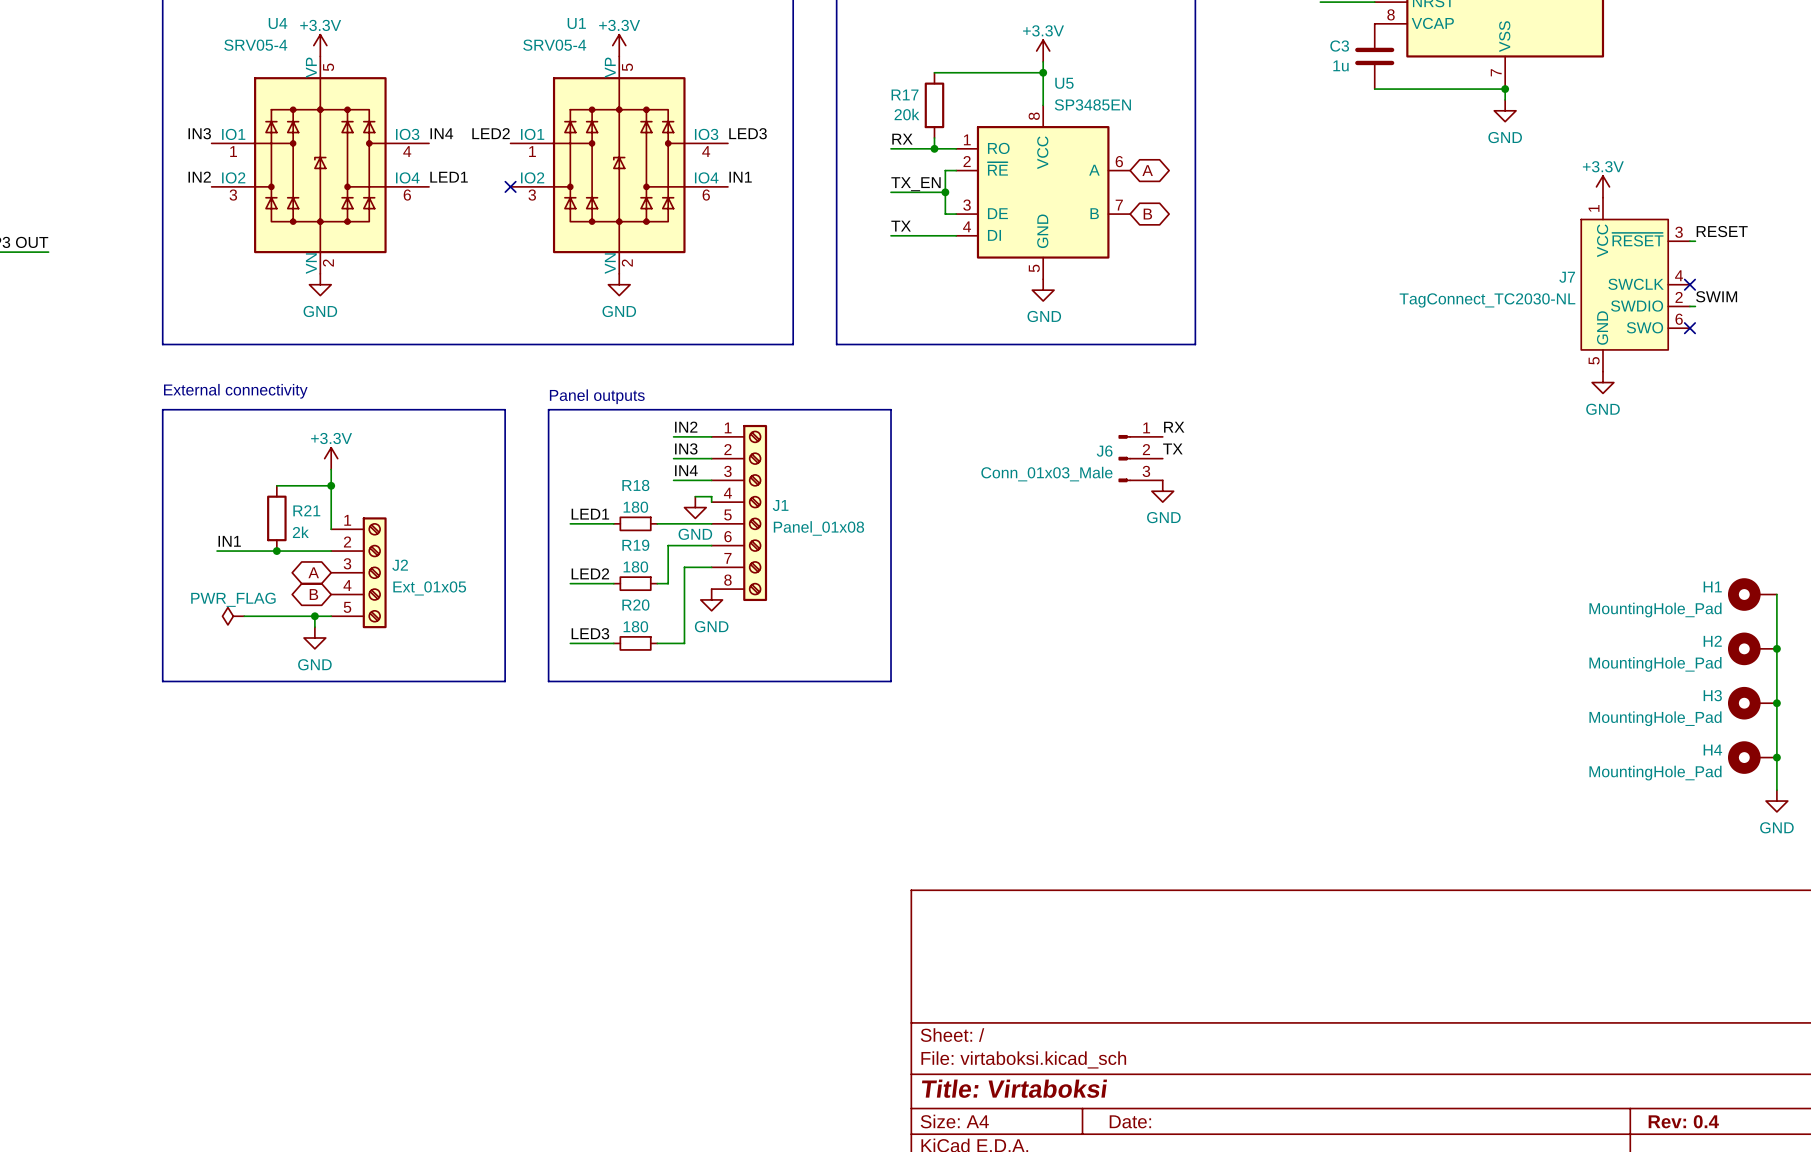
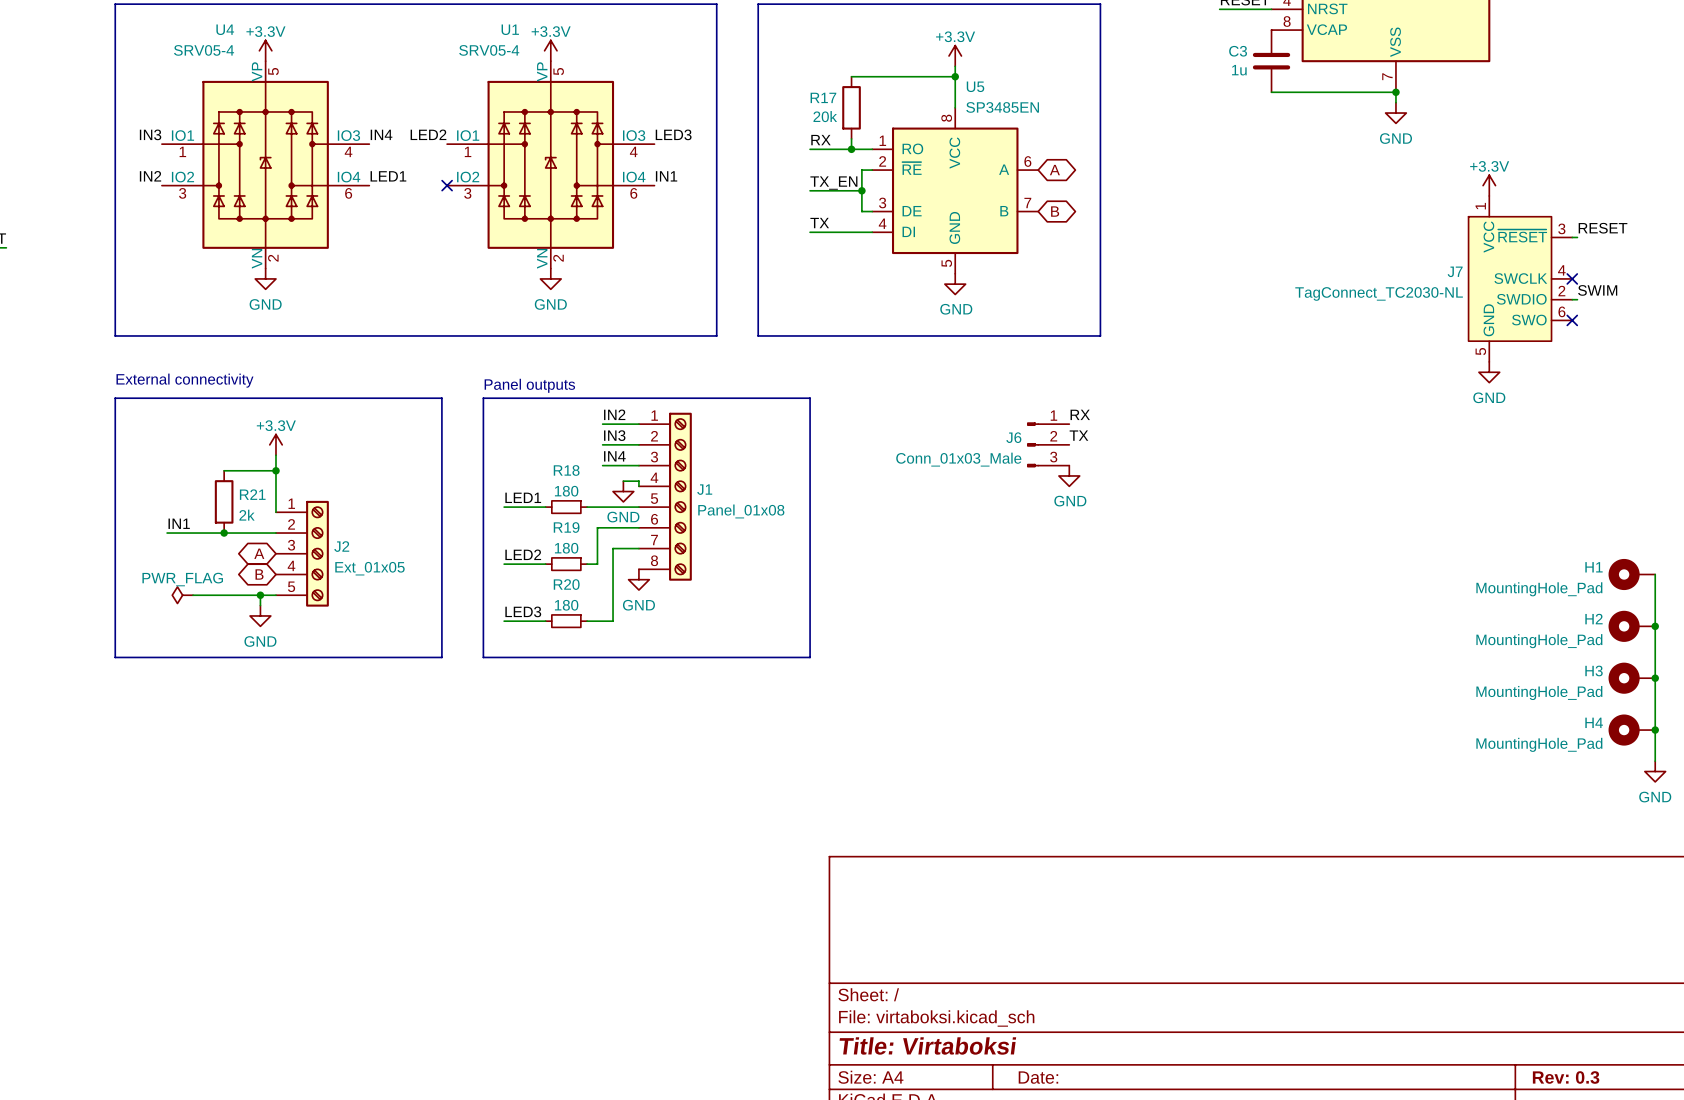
title block: Rev: 0.4 (1683, 1121) -> Rev: 0.3 (1566, 1077)

